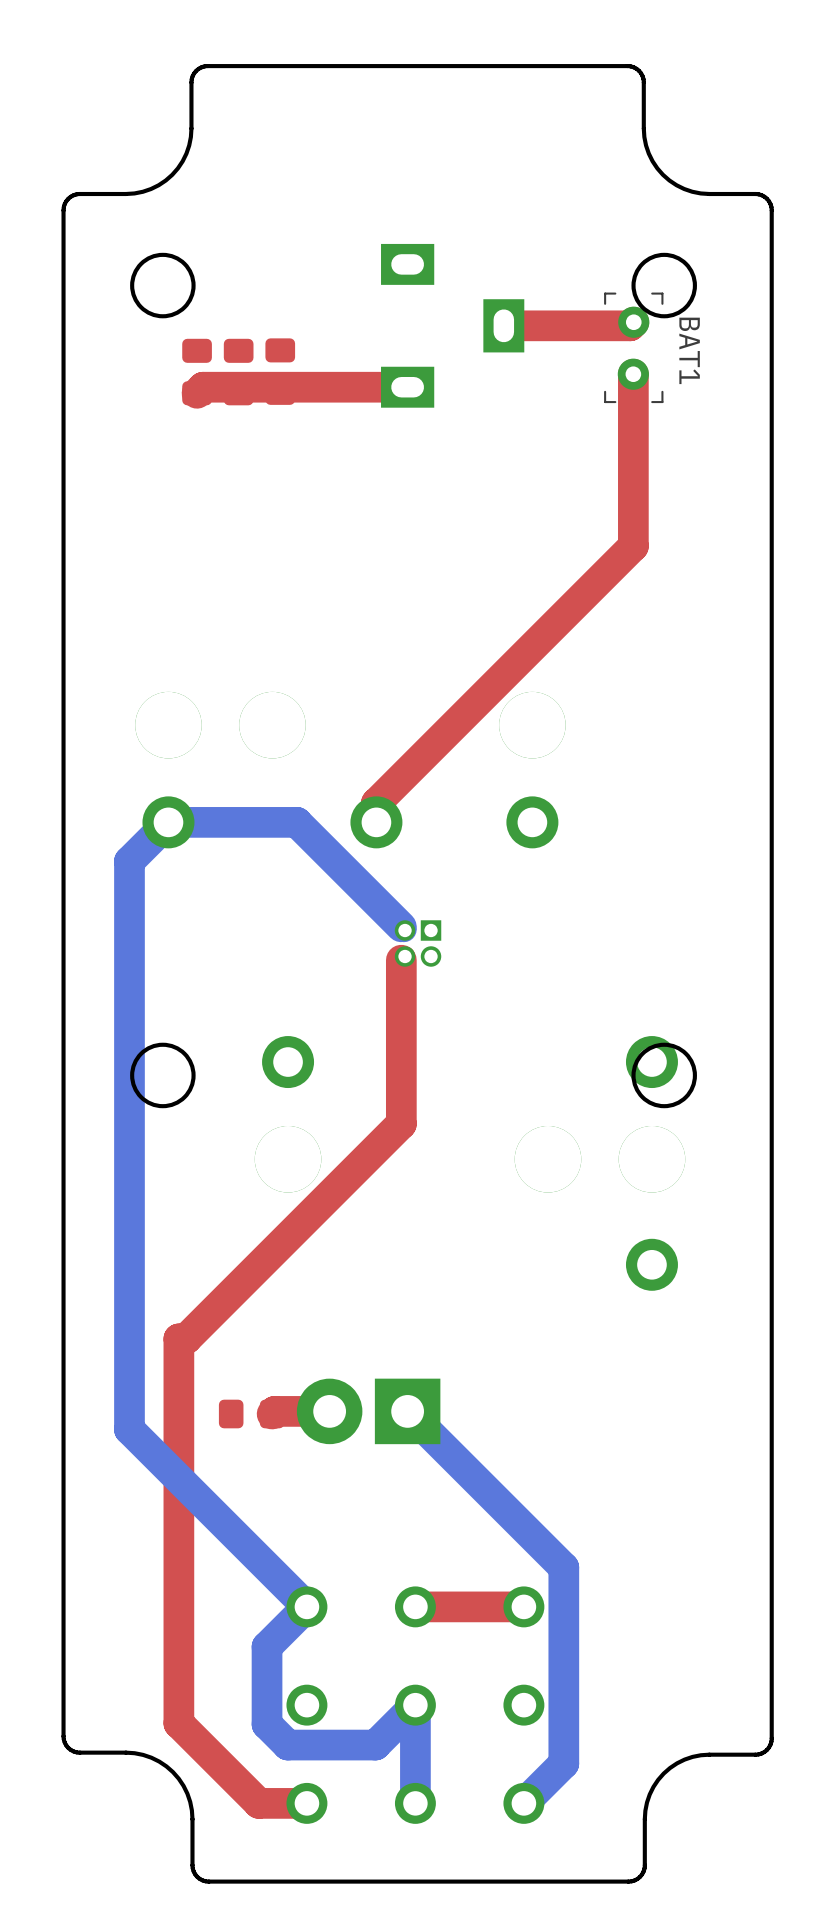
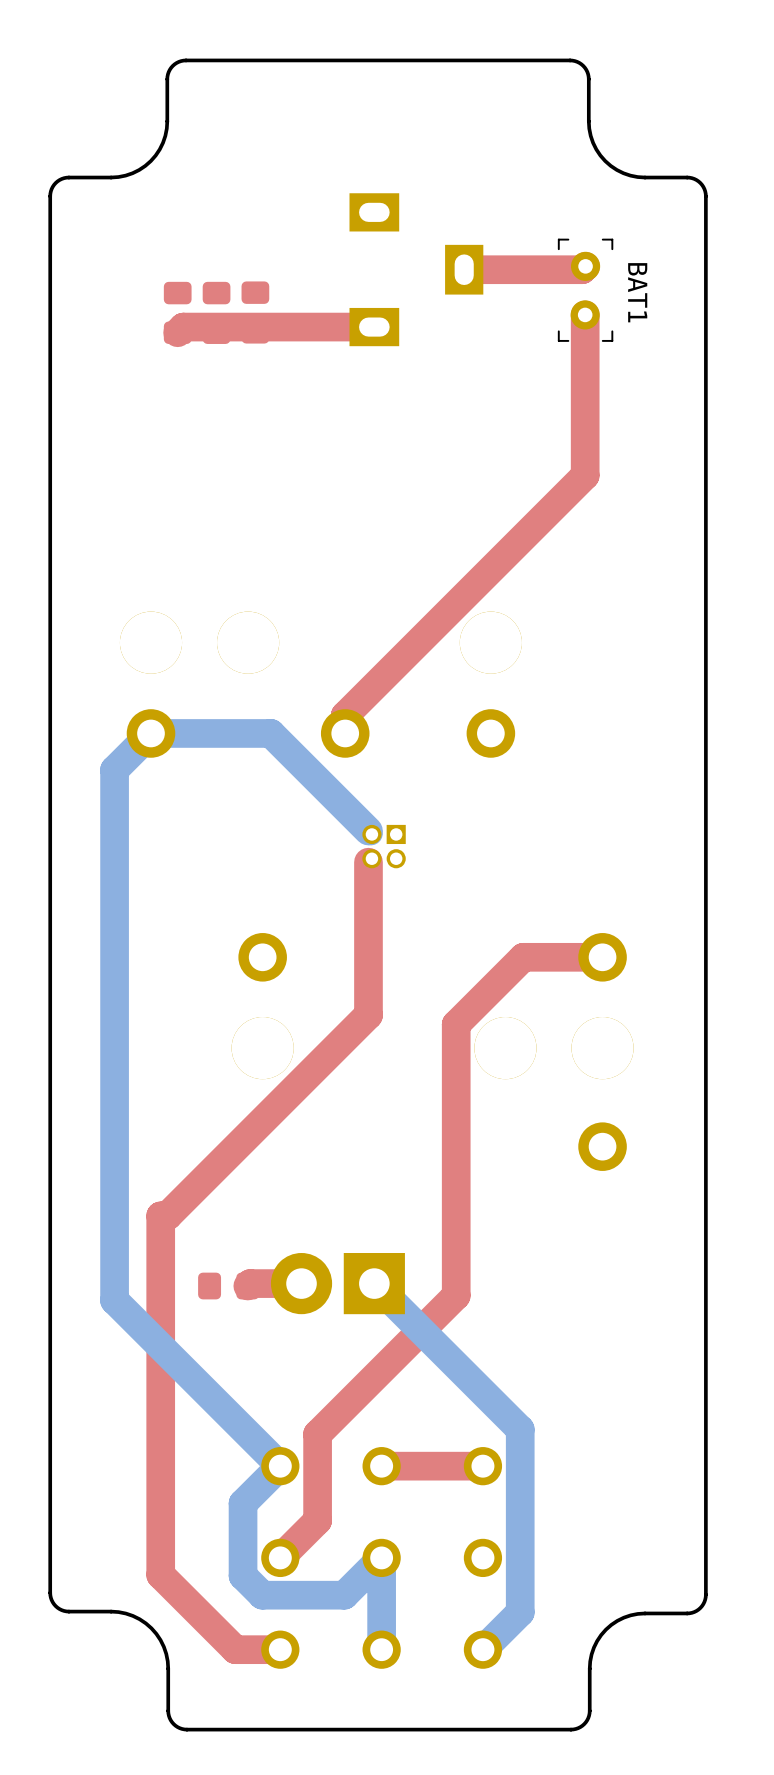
board edge: (627, 66) (203, 66) (196, 70) (192, 77) (191, 128) (189, 145) (182, 161) (172, 174) (158, 185) (142, 191) (125, 194) (75, 194) (68, 199) (63, 206) (63, 1737) (67, 1746) (74, 1751) (125, 1752) (143, 1754) (159, 1761) (173, 1772) (183, 1785) (190, 1801) (192, 1819) (193, 1869) (197, 1877) (205, 1881) (632, 1881) (639, 1876) (644, 1869) (647, 1802) (653, 1786) (663, 1773) (677, 1763) (692, 1756) (759, 1754) (767, 1749) (771, 1742) (771, 208) (768, 200) (760, 194) (692, 191) (676, 185) (662, 174) (652, 161) (646, 145) (642, 77) (637, 69) (627, 66) -> (570, 60) (579, 62) (587, 72) (590, 135) (596, 149) (605, 161) (623, 173) (637, 177) (692, 178) (702, 184) (705, 193) (705, 1599) (700, 1607) (692, 1612) (637, 1613) (617, 1620) (605, 1629) (597, 1641) (590, 1661) (589, 1715) (584, 1724) (575, 1728) (182, 1728) (173, 1724) (168, 1715) (167, 1661) (163, 1646) (151, 1628) (139, 1619) (125, 1613) (64, 1610) (54, 1604) (50, 1595) (50, 191) (55, 183) (64, 178) (118, 177) (132, 173) (150, 161) (163, 142) (166, 128) (167, 74) (172, 65) (181, 61) (570, 60)
round board edge: [130, 252, 196, 319] -> none
round board edge: [631, 252, 697, 319] -> none
round board edge: [130, 1042, 196, 1109] -> none
round board edge: [631, 1042, 697, 1109] -> none
top track: none -> (602, 957) (523, 957) (456, 1024) (456, 1295) (317, 1434) (317, 1520) (280, 1557)

